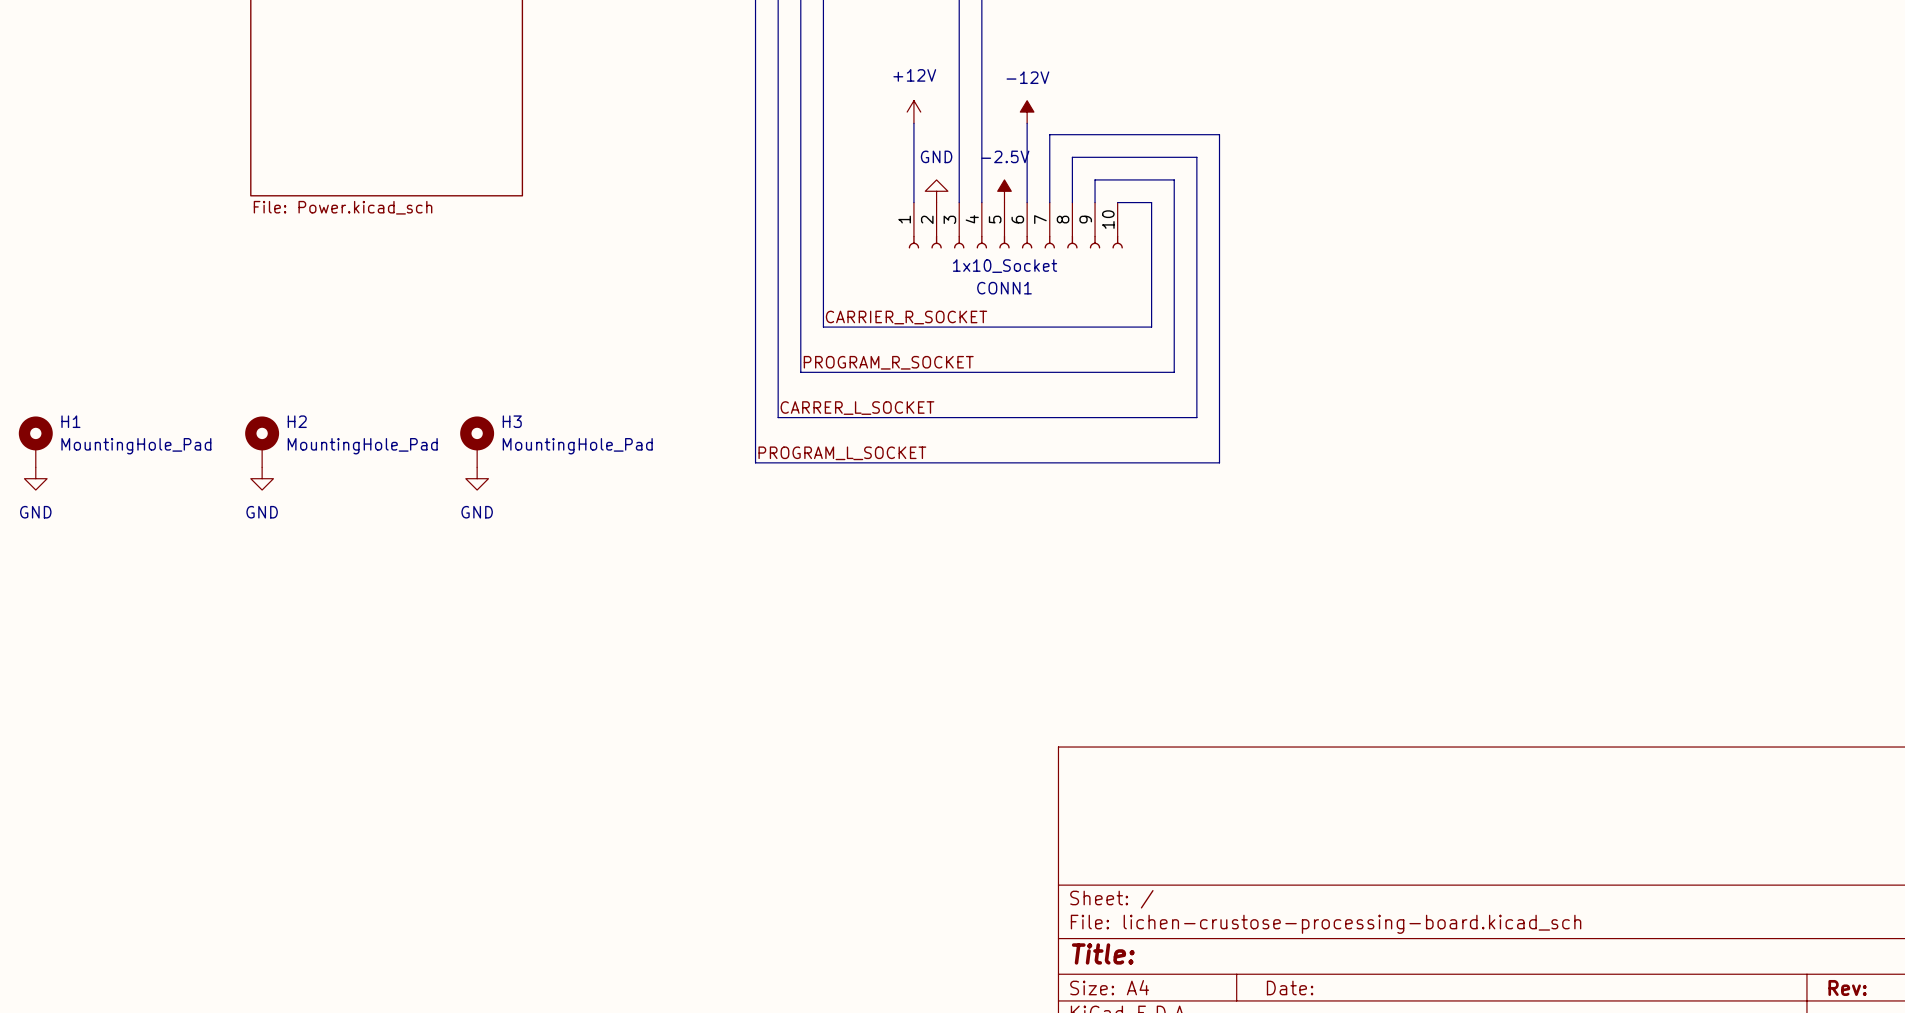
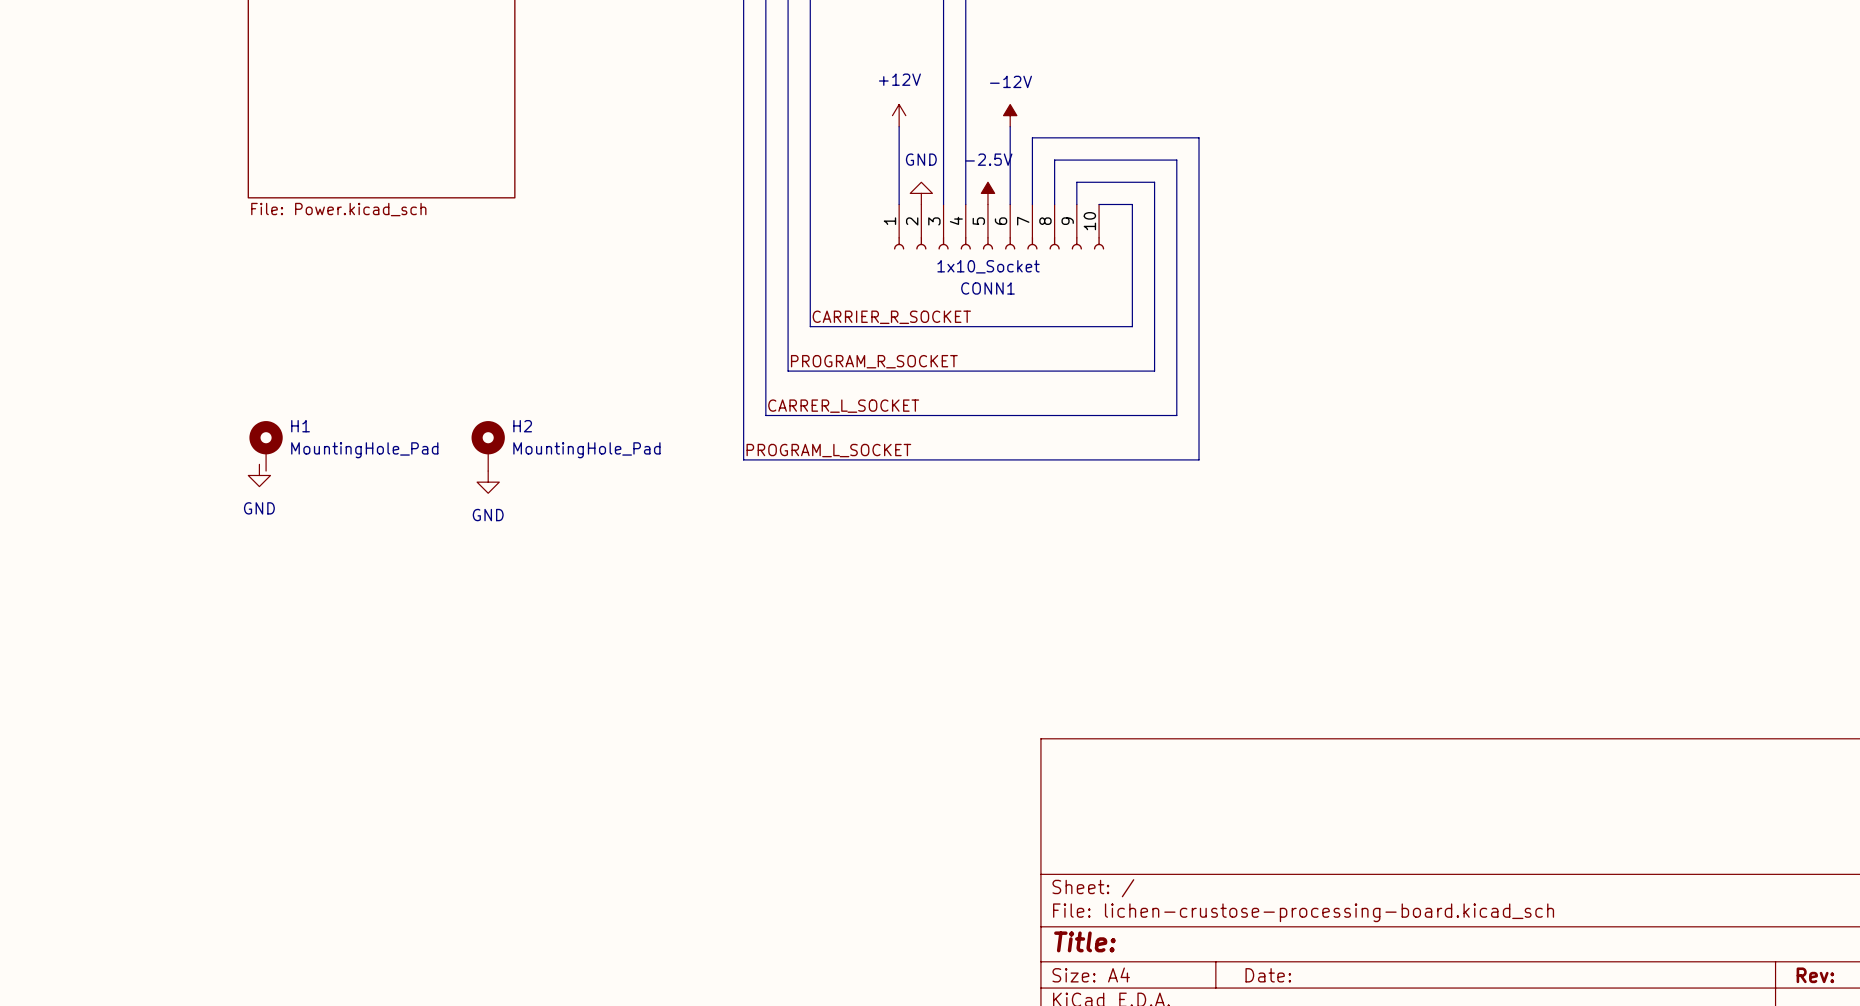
H1 position: (35, 441) -> (266, 446)
H2 position: (262, 441) -> (488, 446)
H3: MountingHole_Pad (477, 441) -> none
power symbol: GND (35, 478) -> none
power symbol position: GND (477, 478) -> GND (488, 482)

